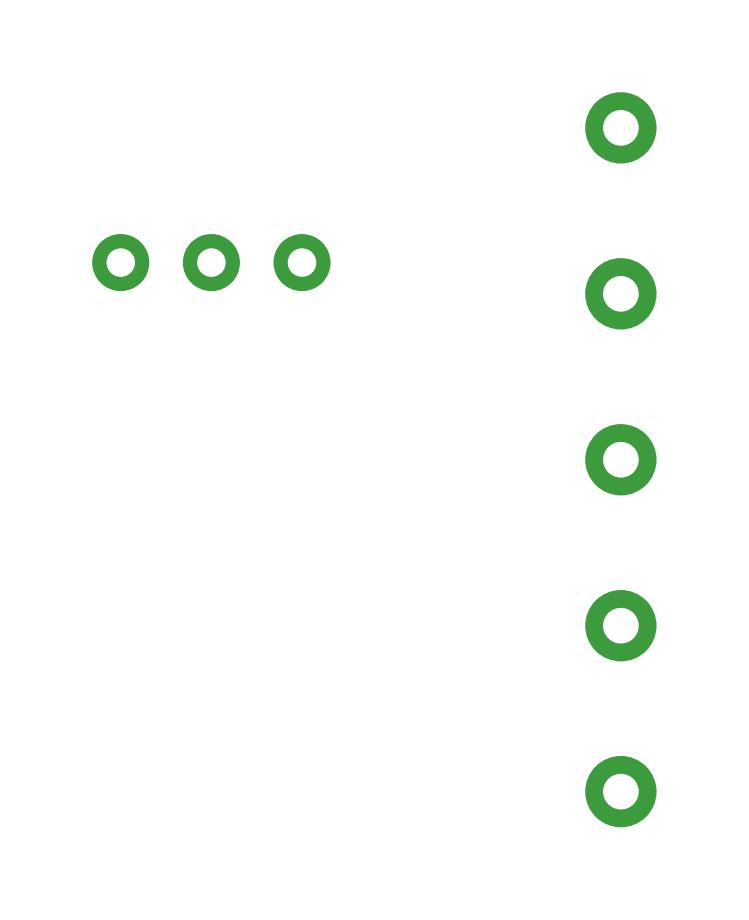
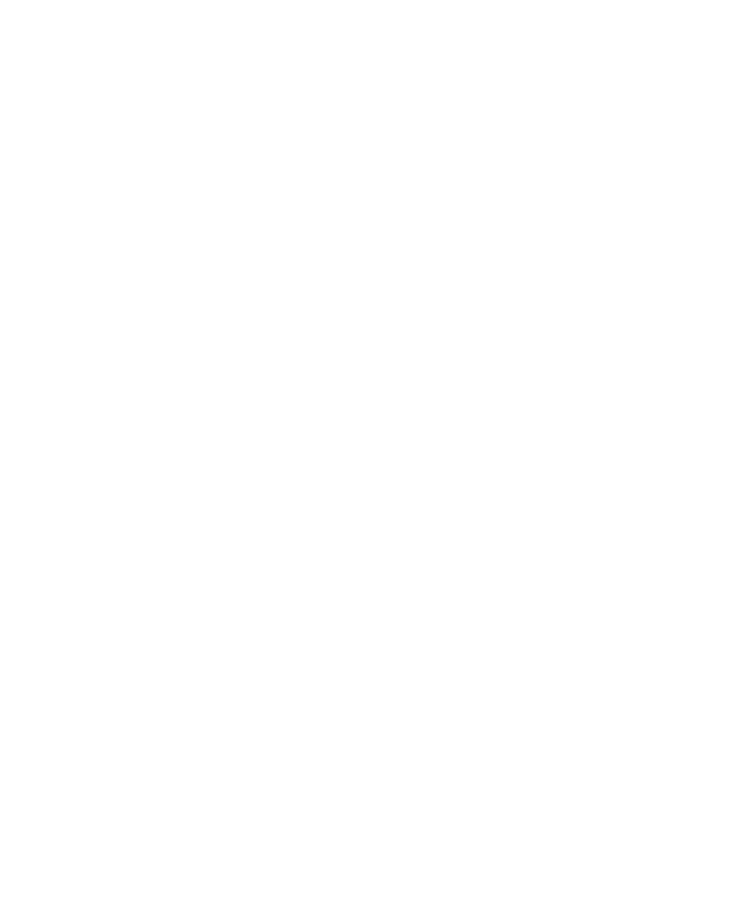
part: (620, 127) -> none
part: (211, 262) -> none
part: (620, 293) -> none
part: (620, 459) -> none
part: (620, 625) -> none
part: (620, 791) -> none

